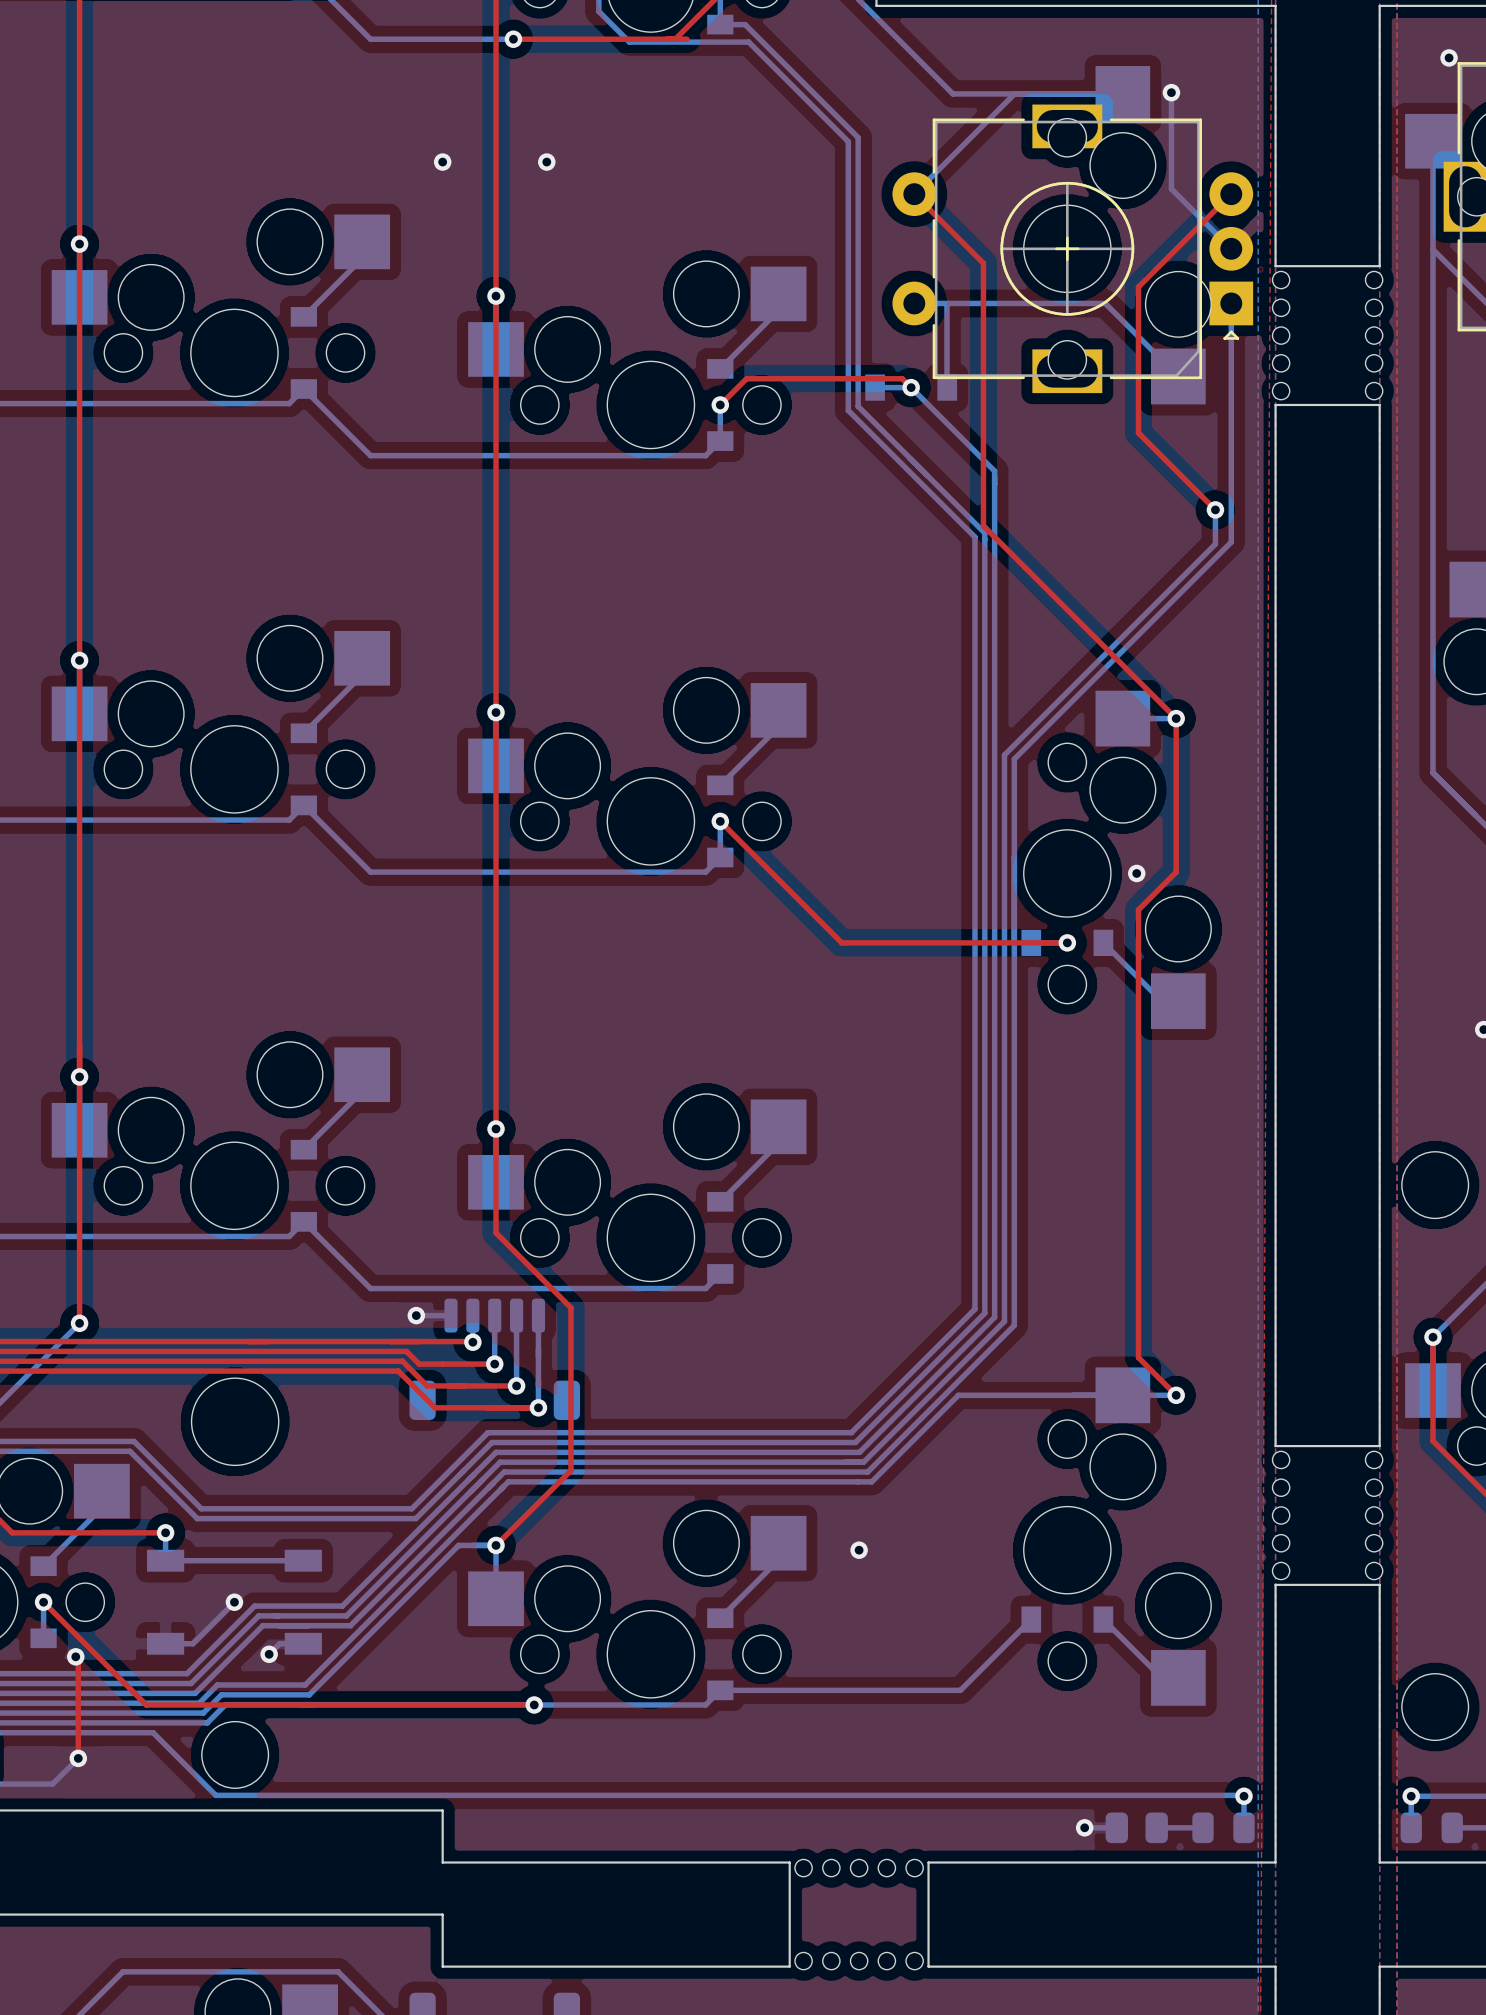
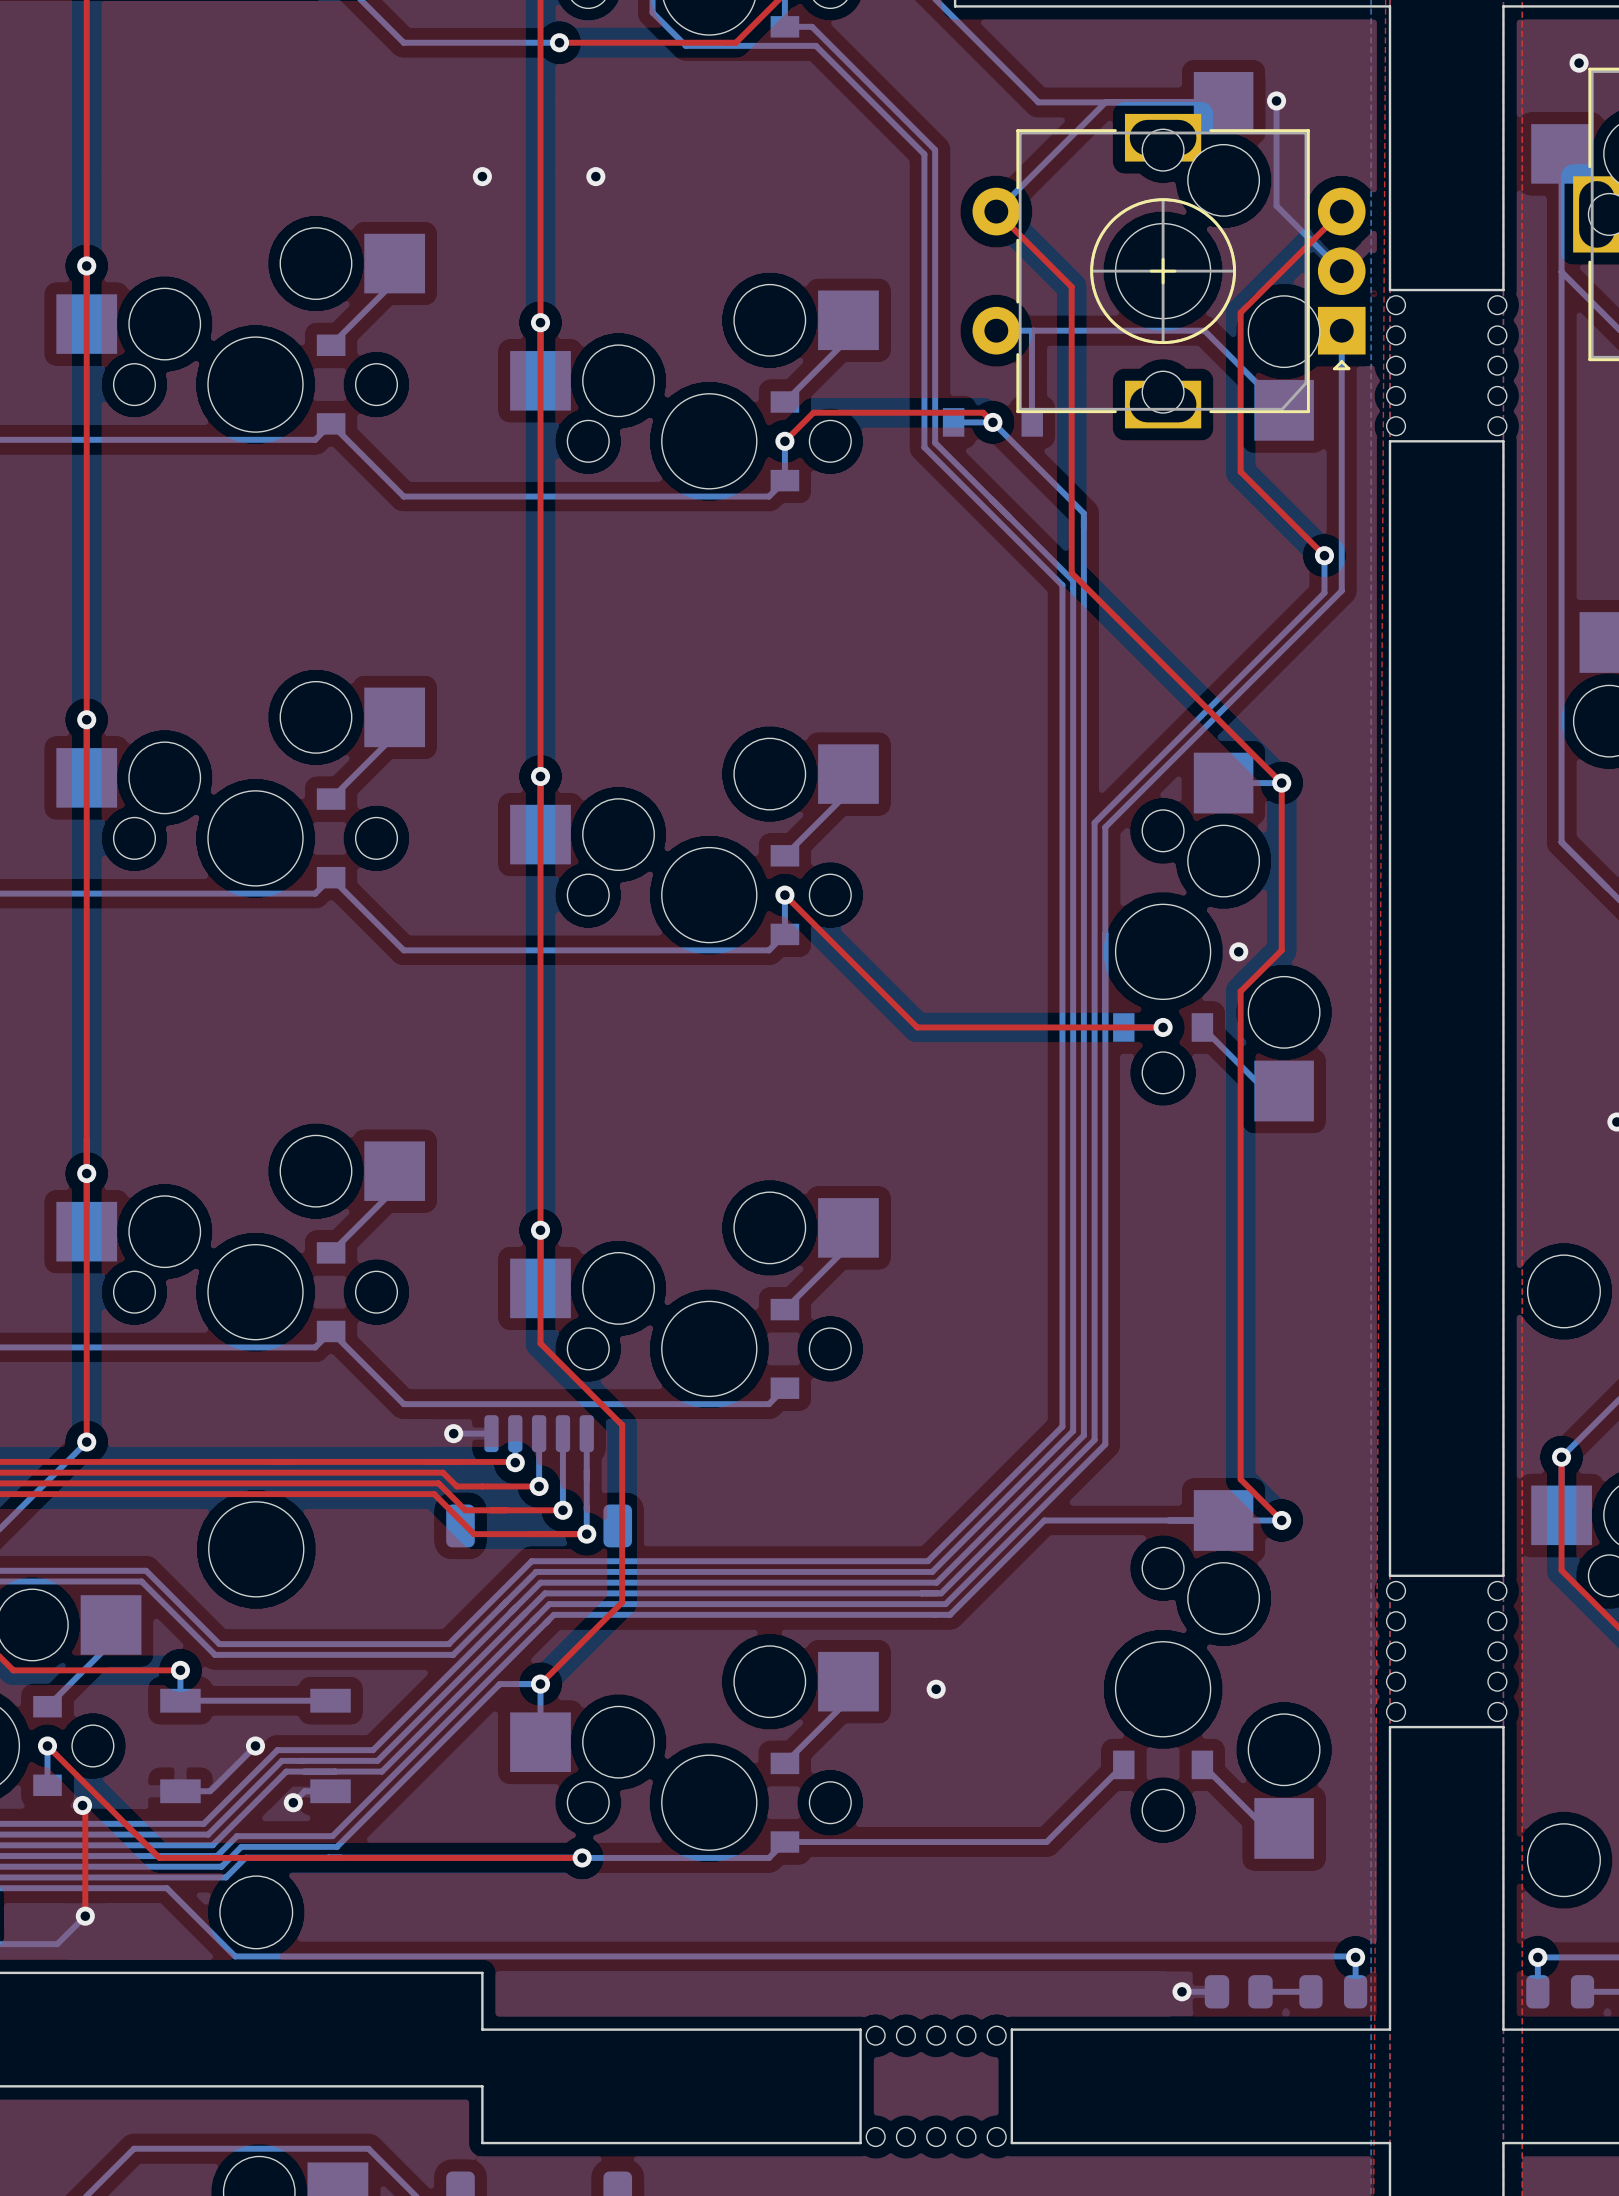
top track: (675, 39) (686, 39) -> none

